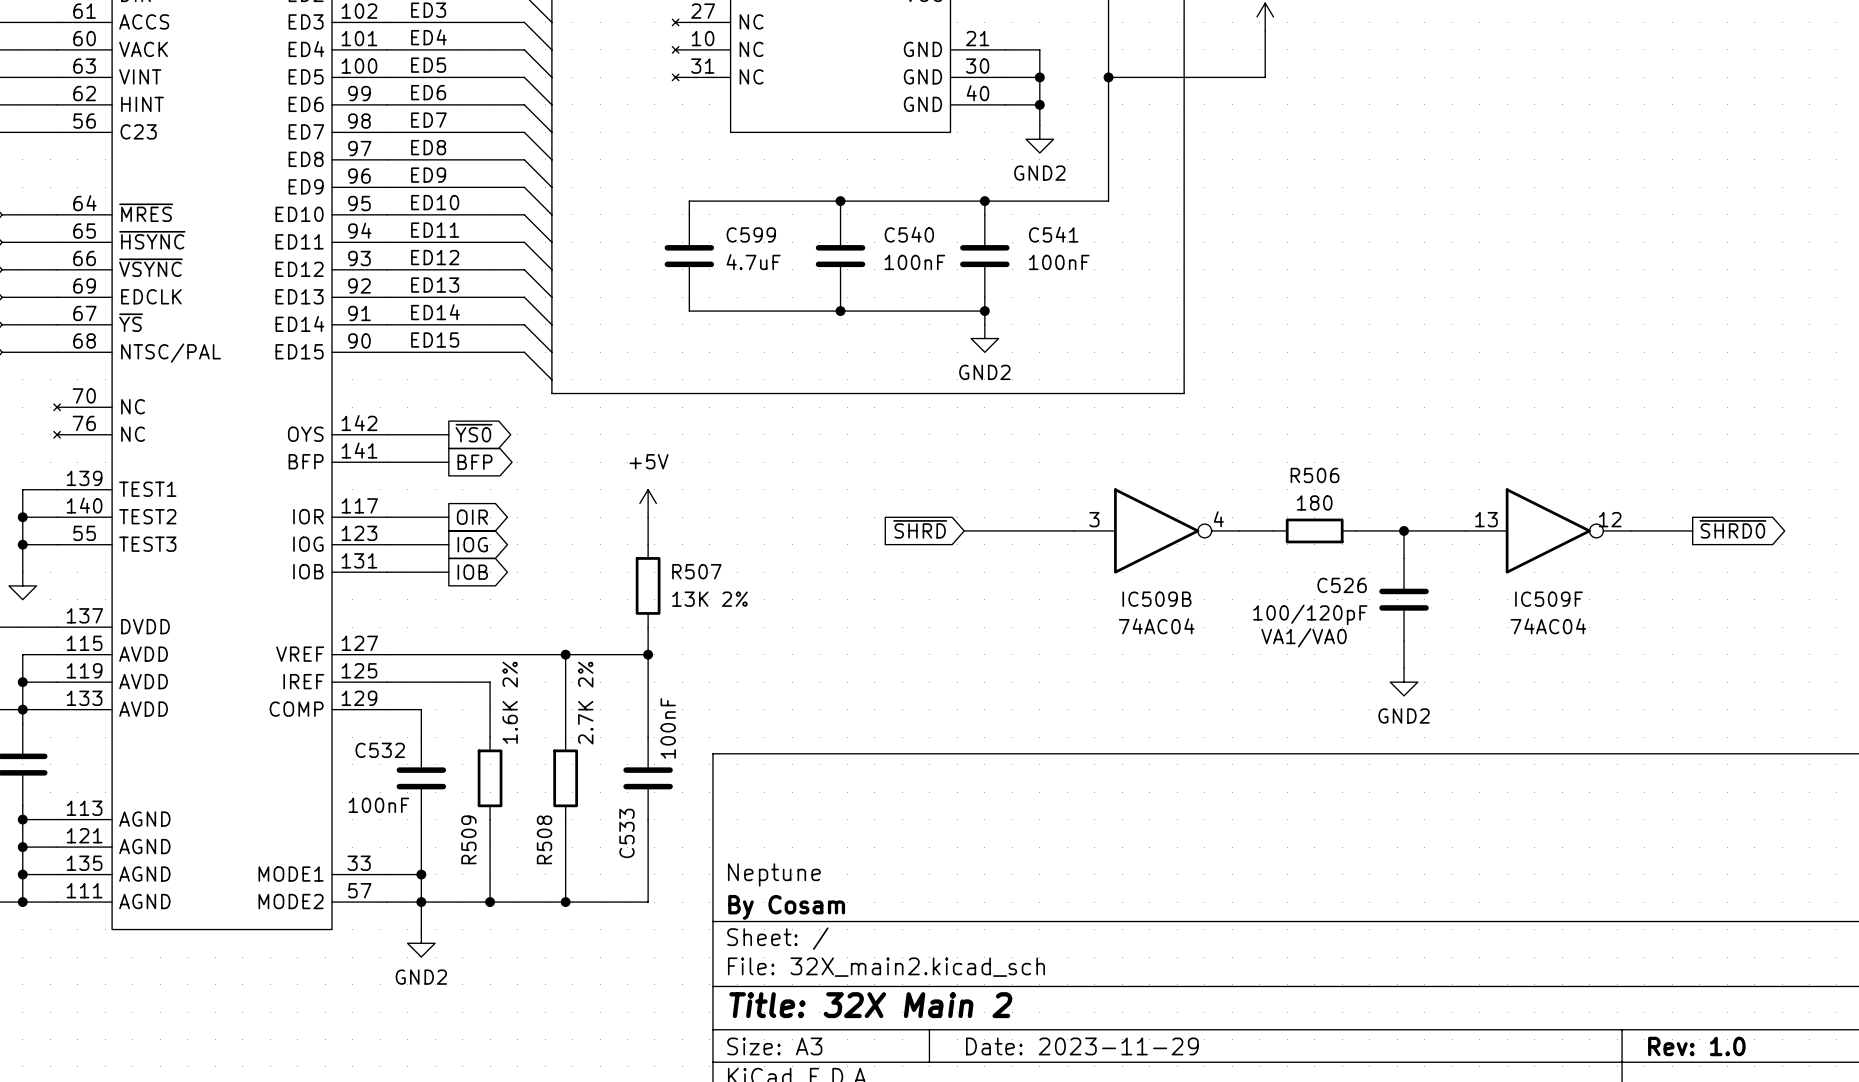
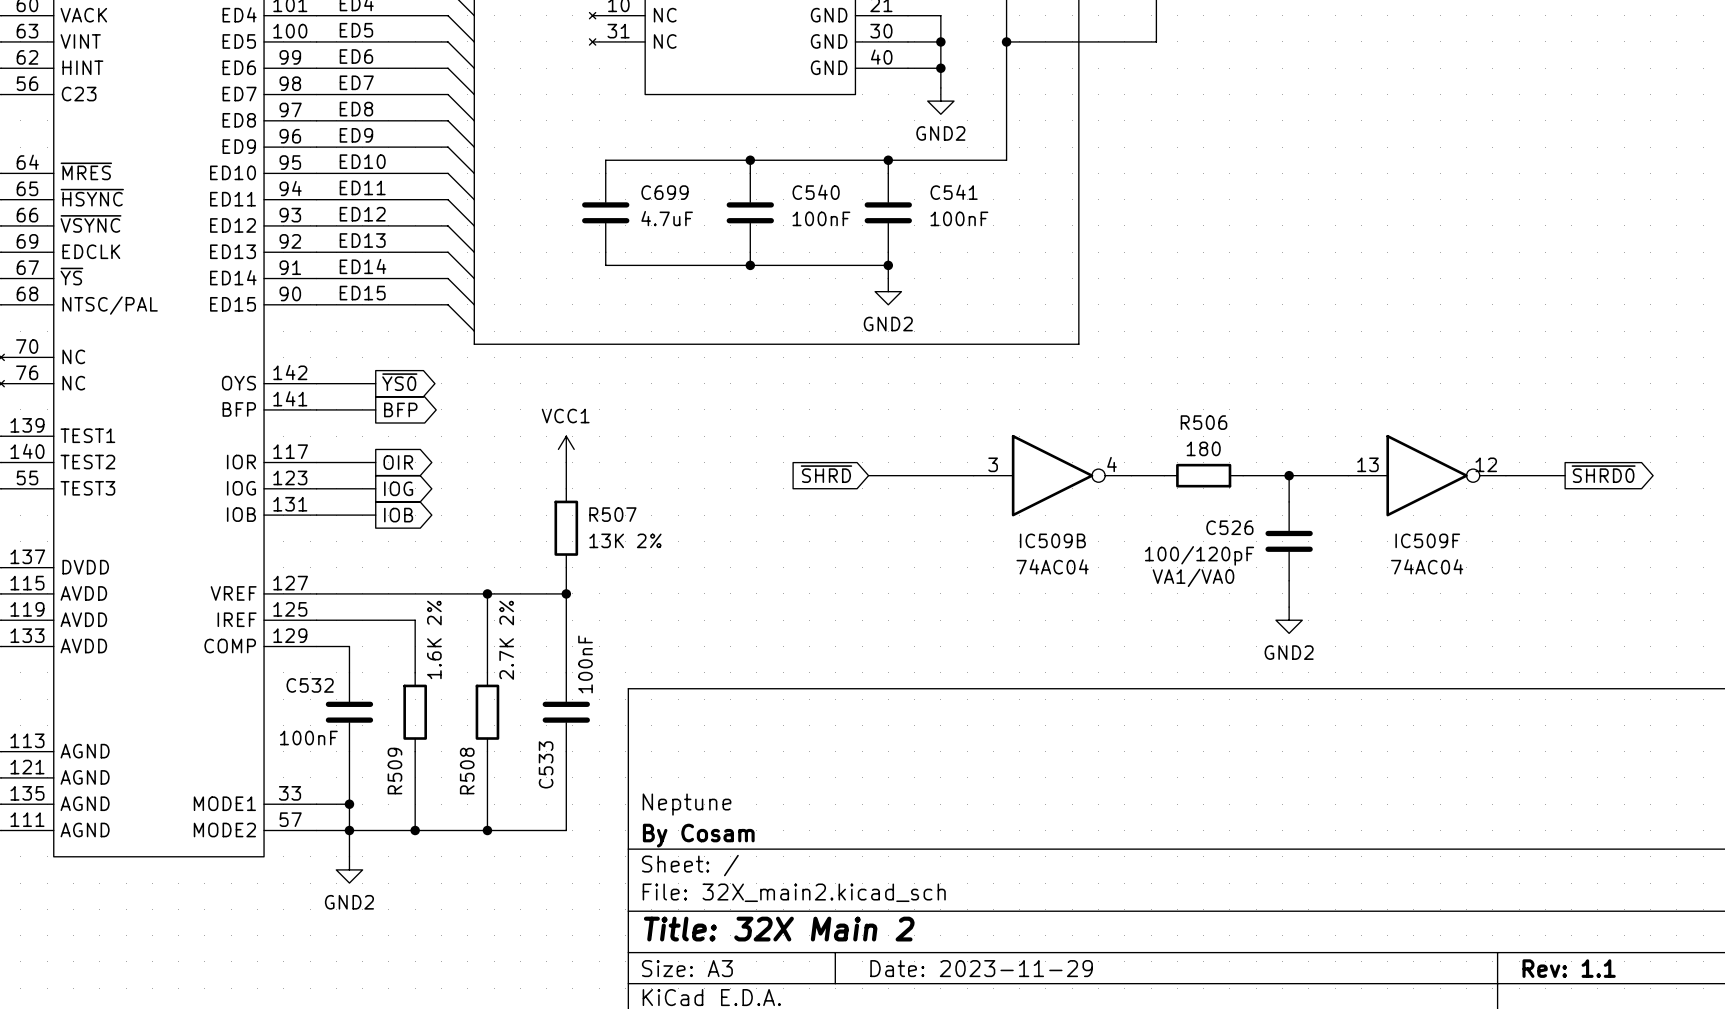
C599 name: C599 (751, 234) -> C699 (664, 192)
power symbol: +5V (648, 503) -> VCC1 (566, 449)
title block: Rev: 1.0 (1696, 1046) -> Rev: 1.1 (1569, 968)

